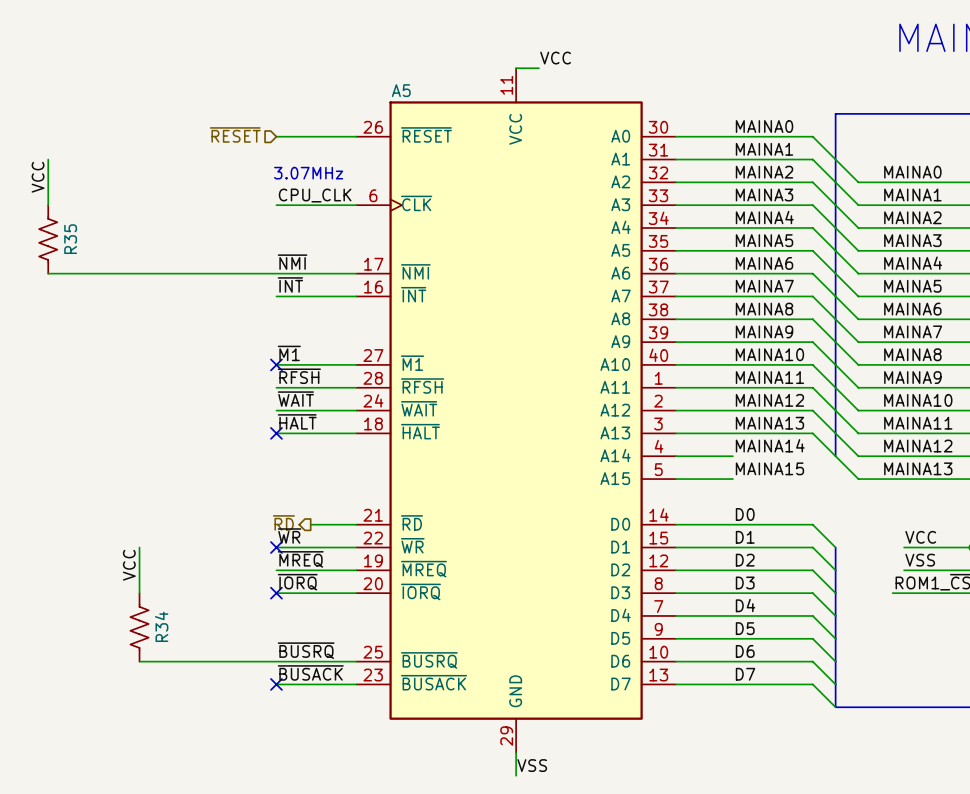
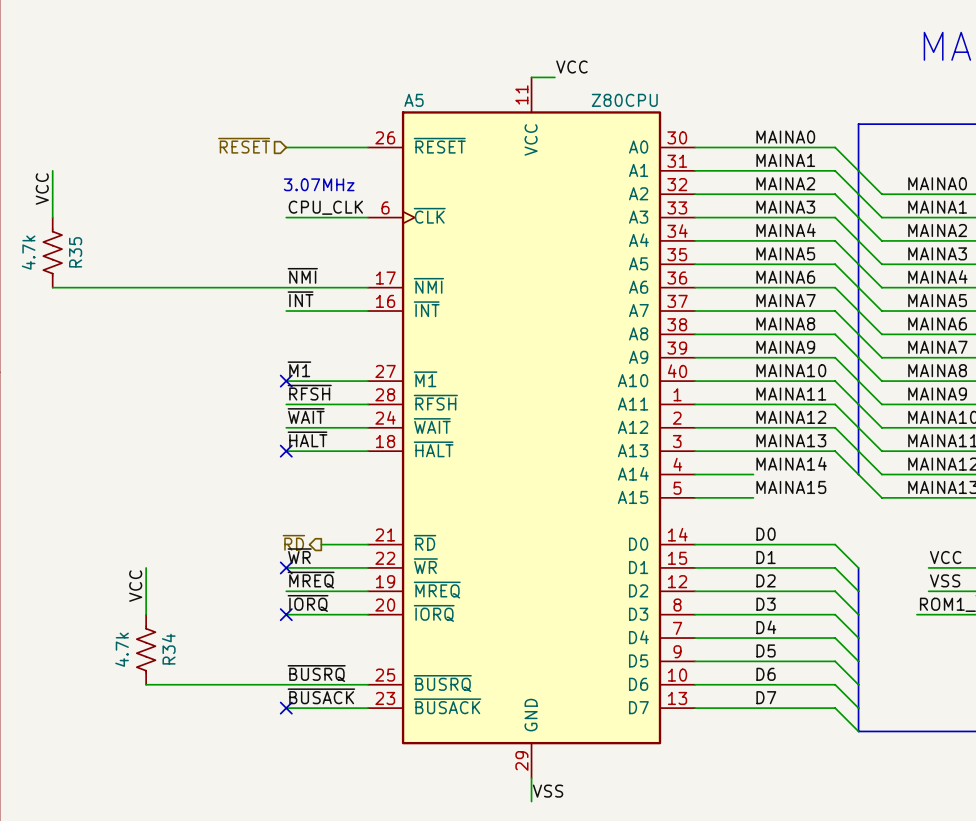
A5 value: none -> Z80CPU (624, 100)
R35 value: none -> 4.7k (28, 252)
R34 value: none -> 4.7k (122, 649)

